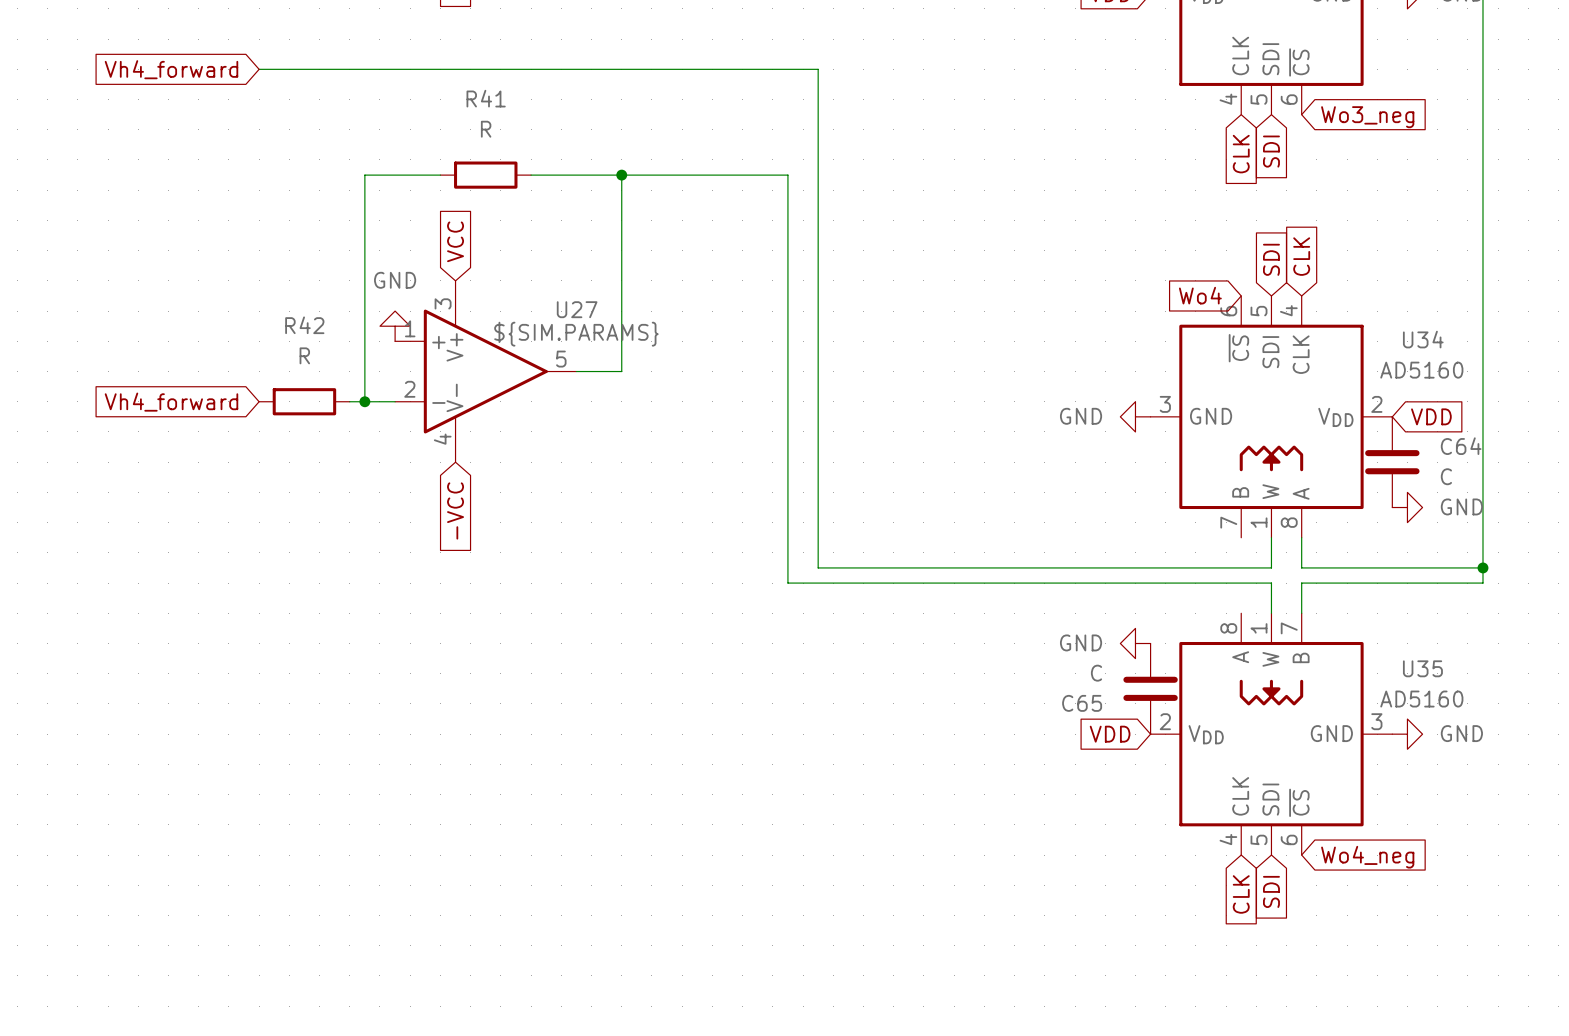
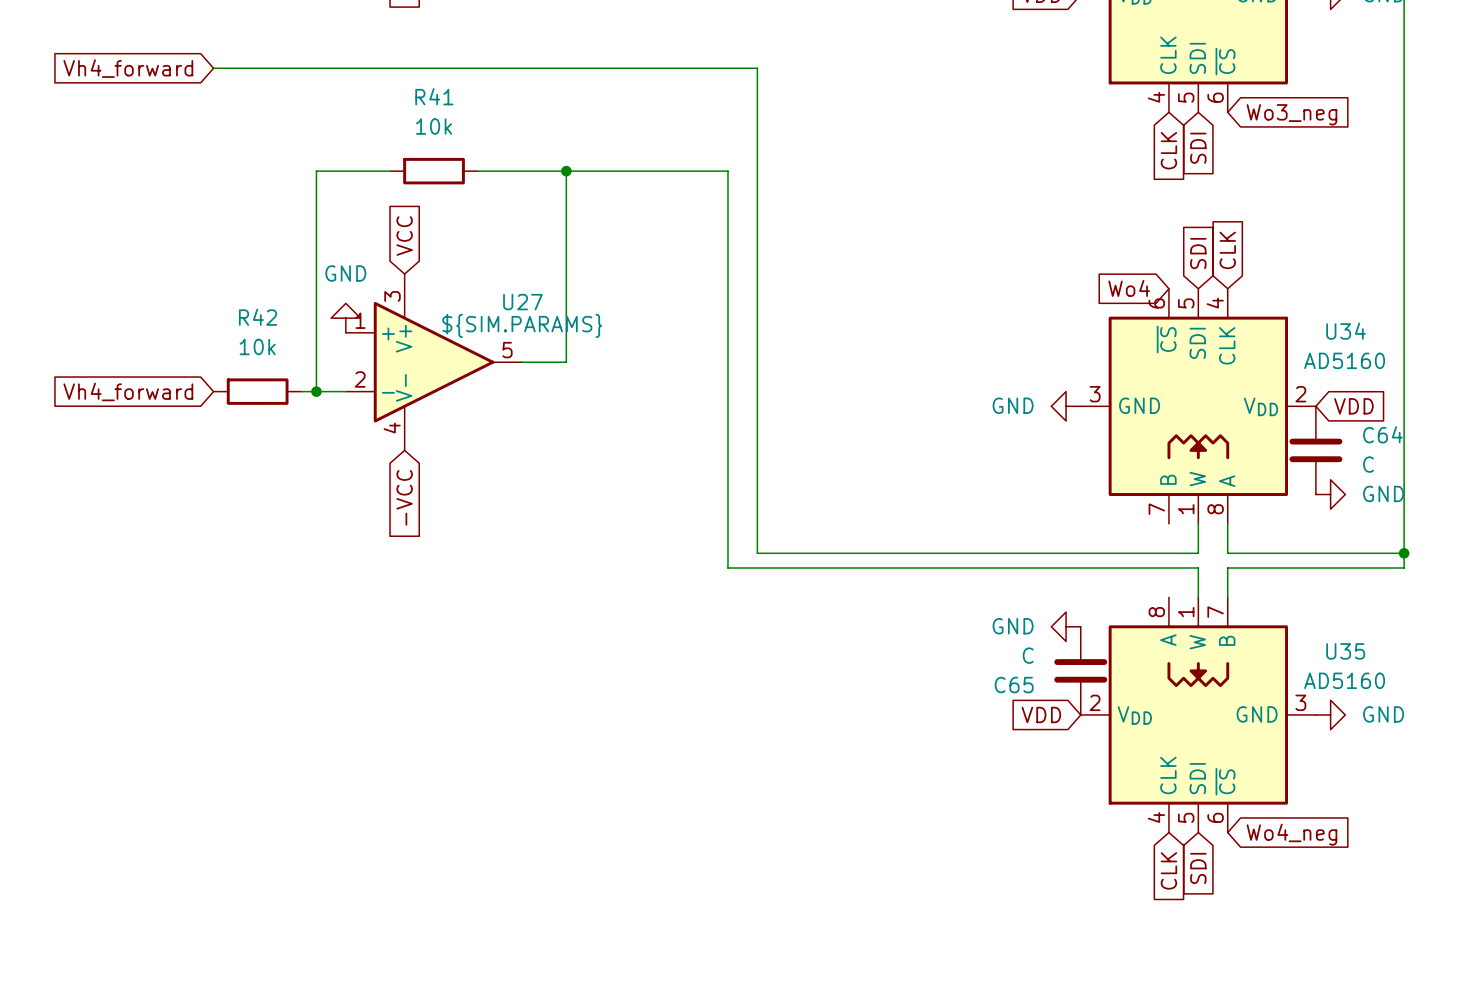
R41 value: R (486, 129) -> 10k (434, 126)
R42 value: R (304, 355) -> 10k (257, 346)

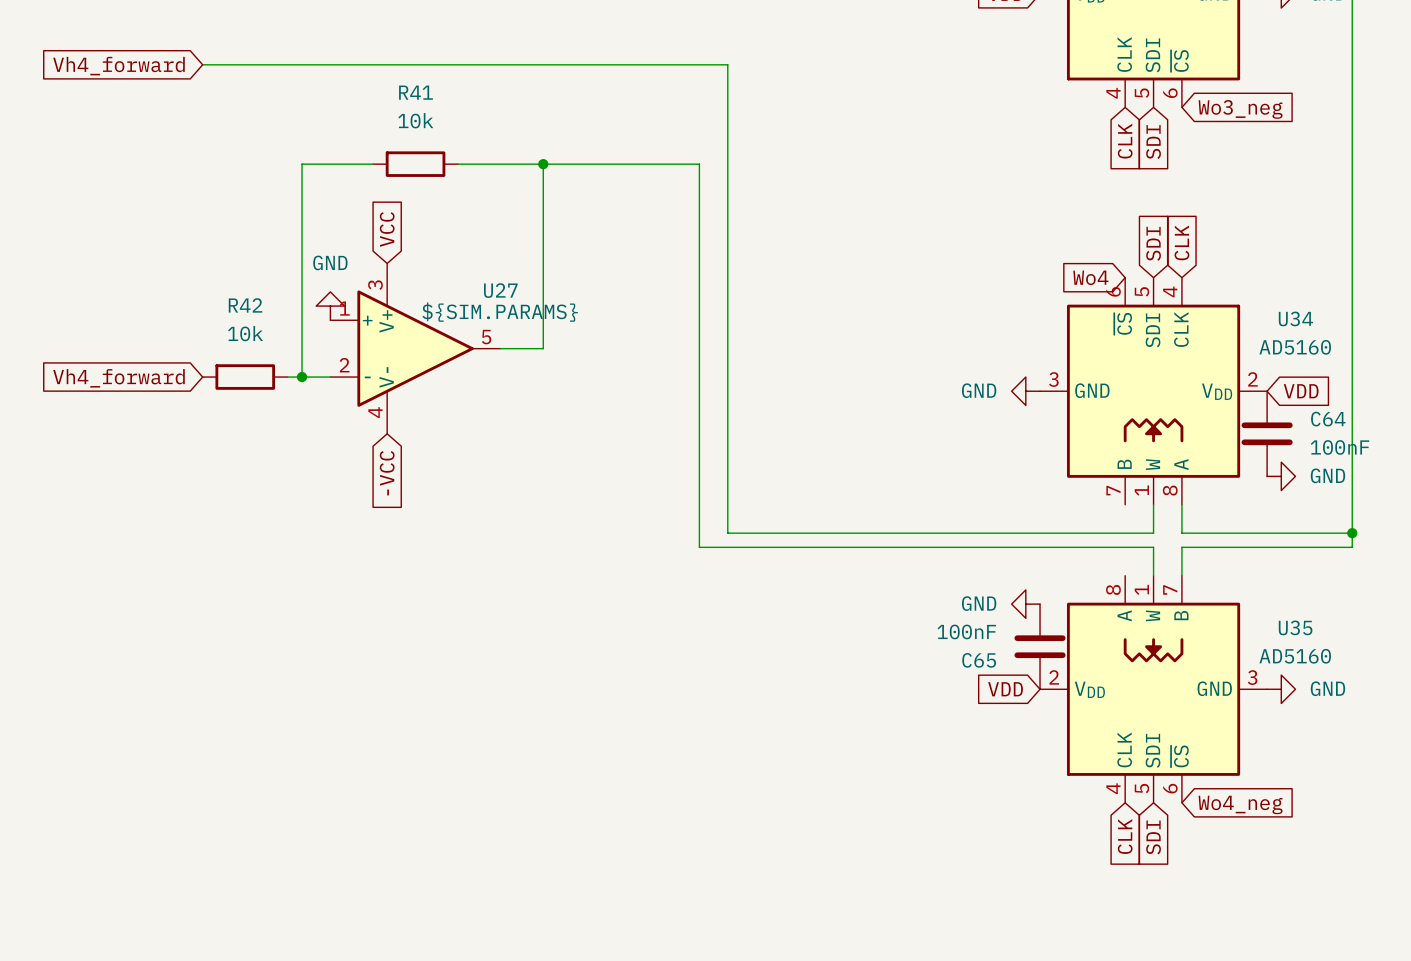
C64 value: C (1368, 464) -> 100nF (1340, 447)
C65 value: C (1028, 655) -> 100nF (966, 631)

